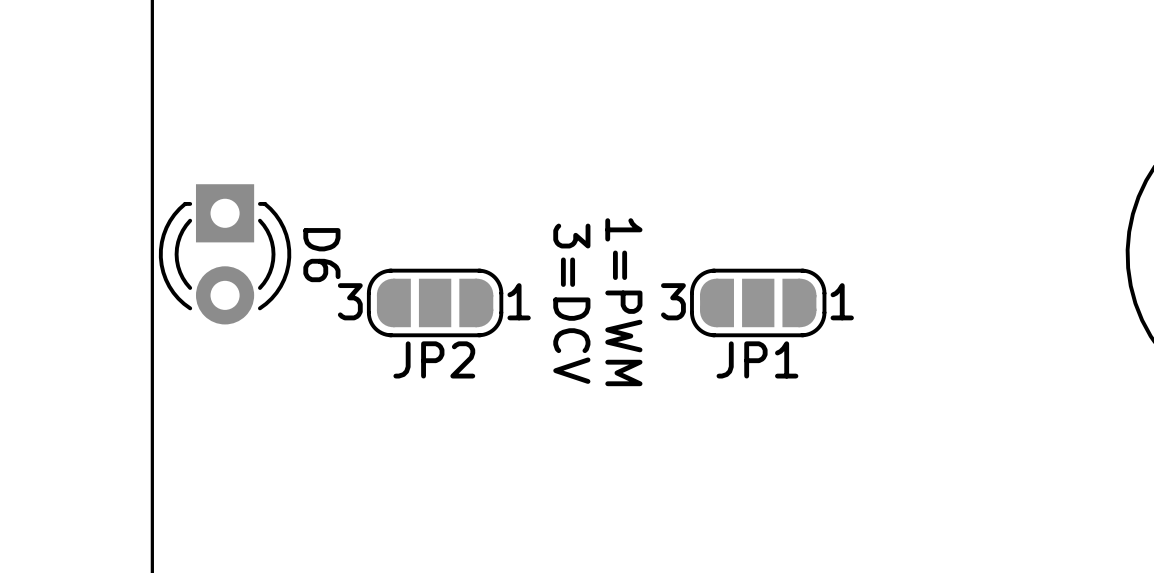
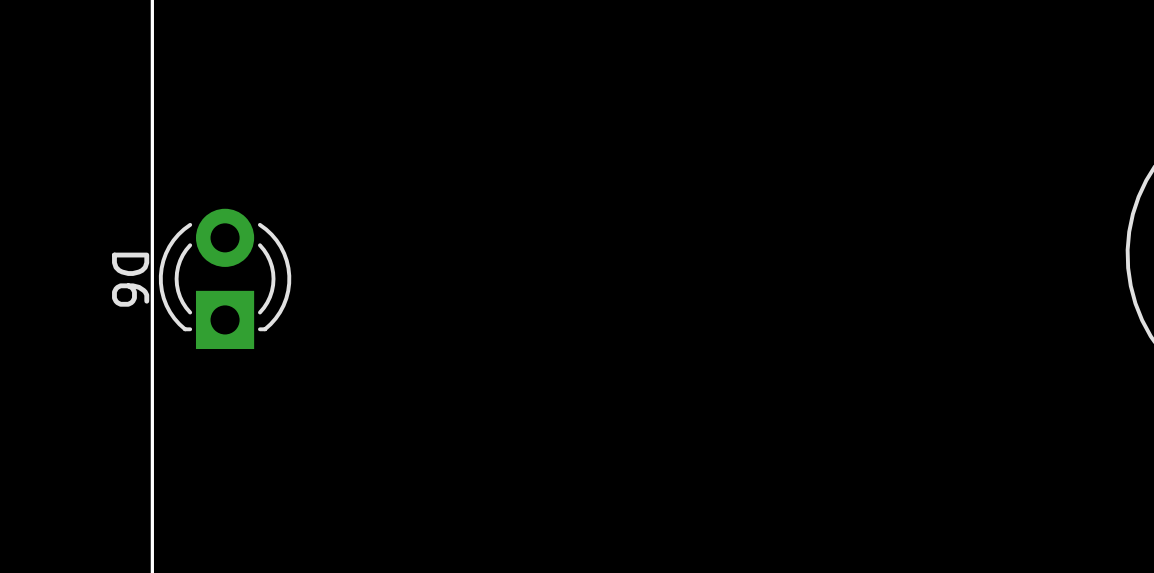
D6 rotation: 0° (225, 254) -> 180° (225, 278)
JP2: (435, 302) -> none
text: 1=PWM (623, 302) -> none
JP1: (758, 302) -> none
text: 3=DCV (571, 303) -> none

